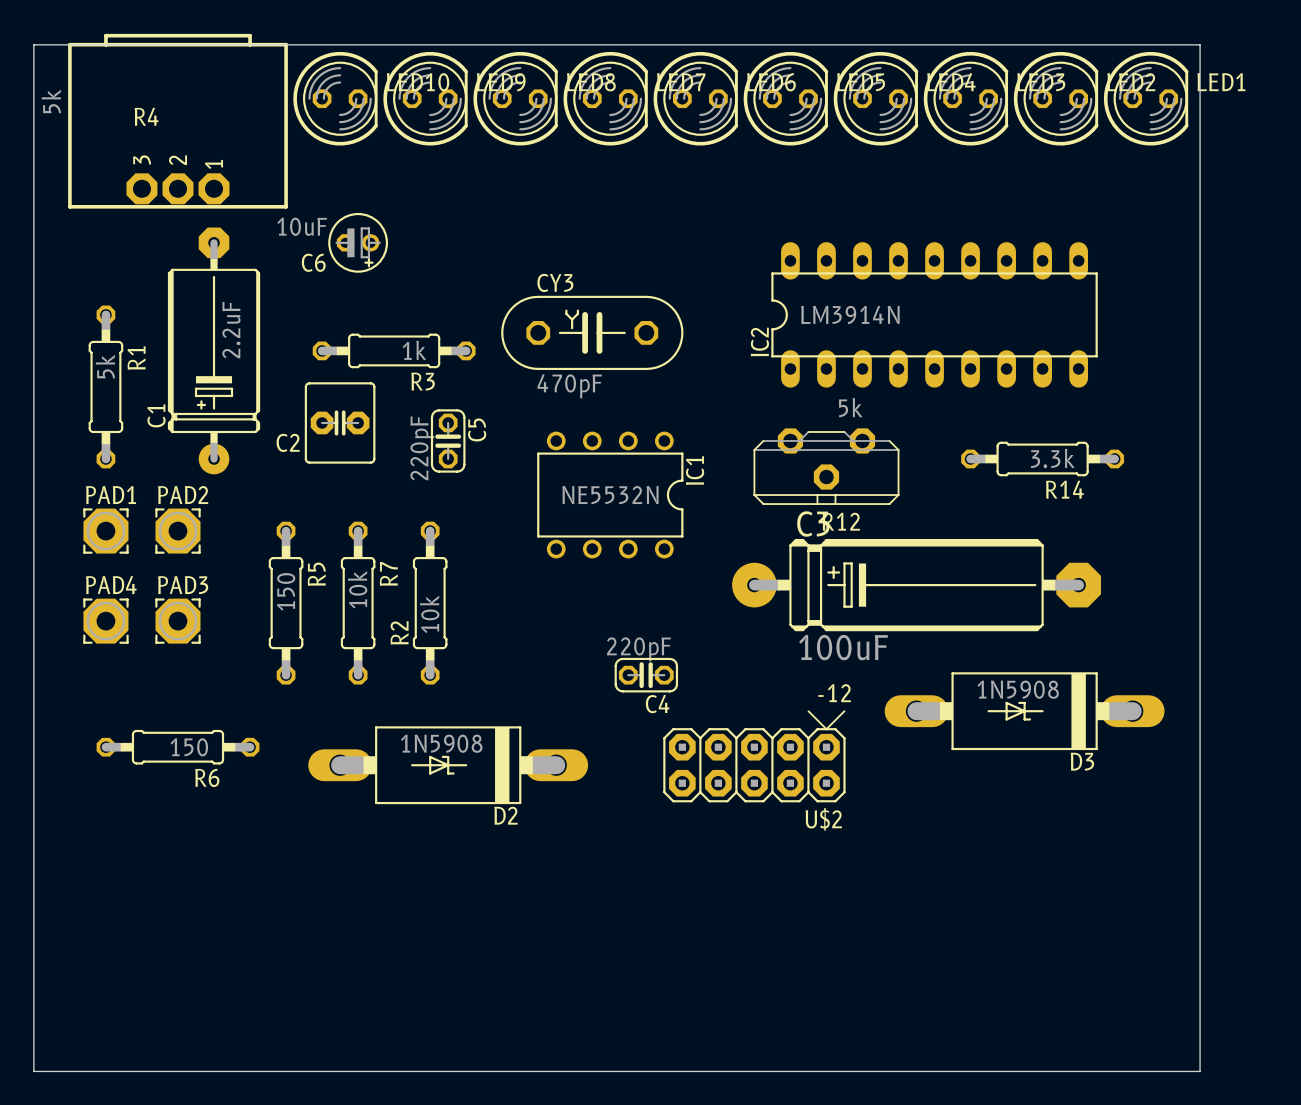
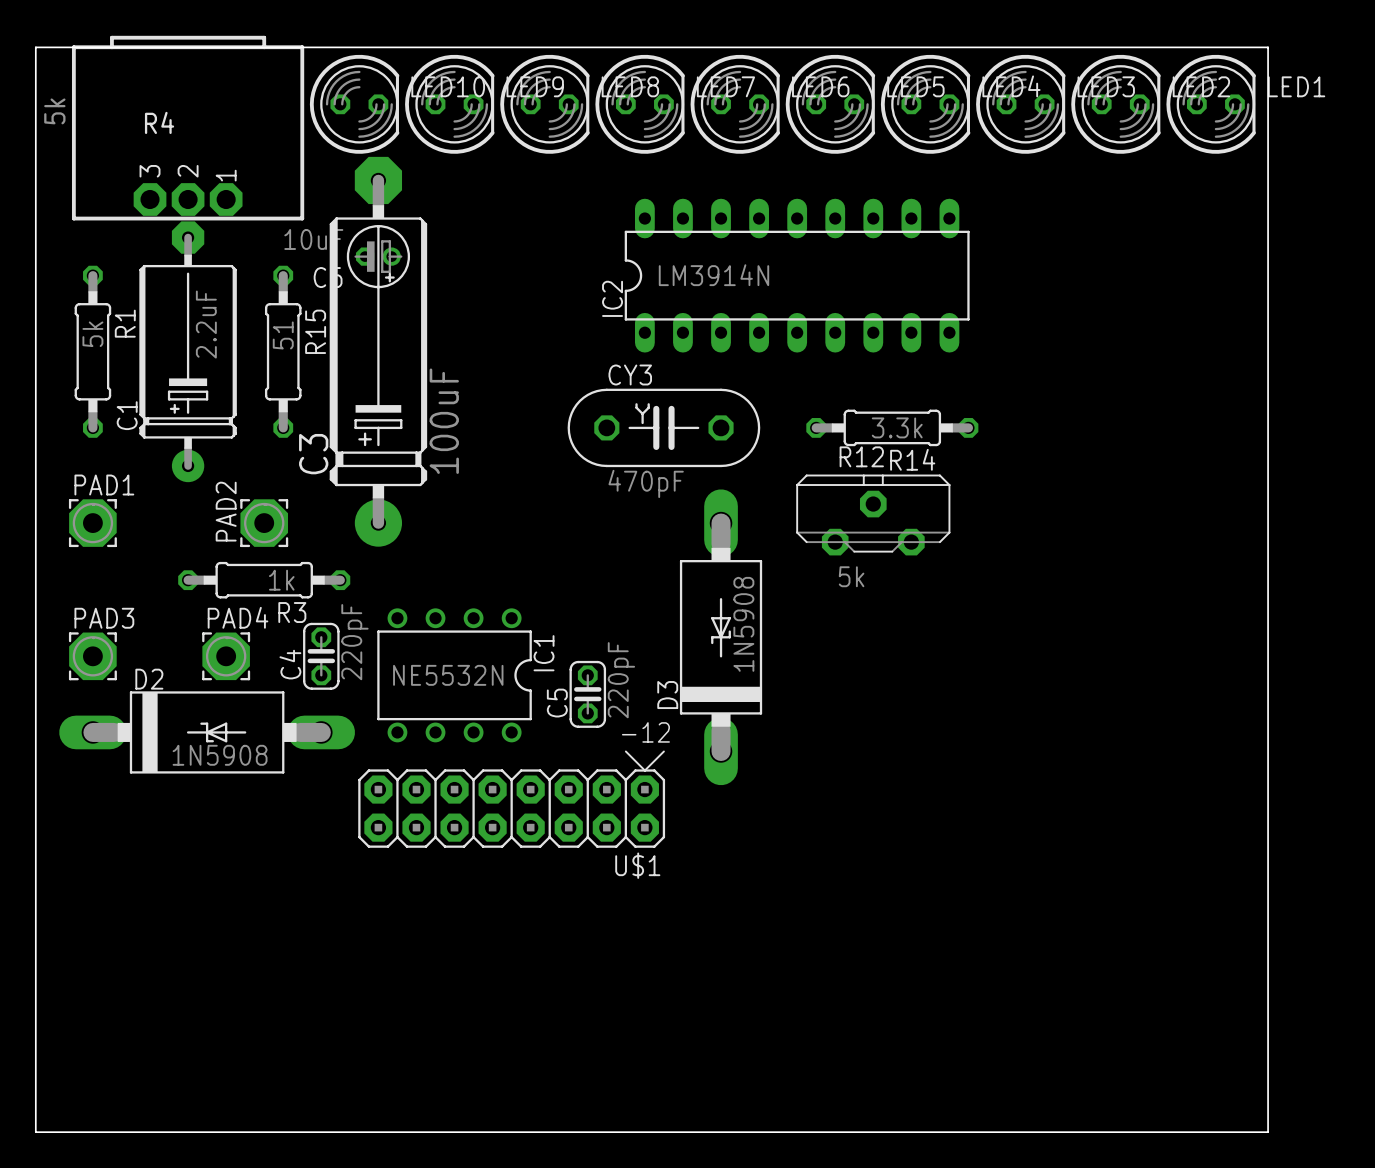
IC2 position: (934, 314) -> (797, 275)
R15: none -> 51 (283, 351)
CY3 position: (592, 332) -> (663, 427)
C1 position: (214, 350) -> (188, 351)
R3 position: (394, 350) -> (264, 580)
R1 position: (105, 386) -> (92, 351)
C2: (340, 422) -> none
C5 rotation: 0° (448, 440) -> 180° (587, 694)
C5 position: (448, 440) -> (587, 694)
R14 position: (1042, 459) -> (892, 427)
R12 rotation: 0° (826, 466) -> 180° (873, 514)
PAD2 name rotation: 0° (183, 495) -> 90° counterclockwise (226, 511)
IC1 position: (610, 495) -> (454, 675)
PAD1 position: (105, 531) -> (92, 523)
PAD2 position: (177, 531) -> (264, 523)
C3 rotation: 0° (916, 585) -> 90° counterclockwise (378, 351)
C3 position: (916, 585) -> (378, 351)
R5: 150 (286, 603) -> none
R7: 10k (358, 603) -> none
R2: 10k (430, 603) -> none
PAD4 position: (105, 621) -> (226, 656)
PAD3 position: (177, 621) -> (92, 656)
C4 rotation: 0° (646, 675) -> 90° clockwise (321, 656)
C4 position: (646, 675) -> (321, 656)
D3 rotation: 0° (1024, 711) -> 90° clockwise (721, 637)
D3 position: (1024, 711) -> (721, 637)
R6: 150 (177, 747) -> none
U$1: none -> (511, 799)
U$2: (754, 756) -> none
D2 rotation: 0° (448, 765) -> 180° (207, 732)
D2 position: (448, 765) -> (207, 732)

